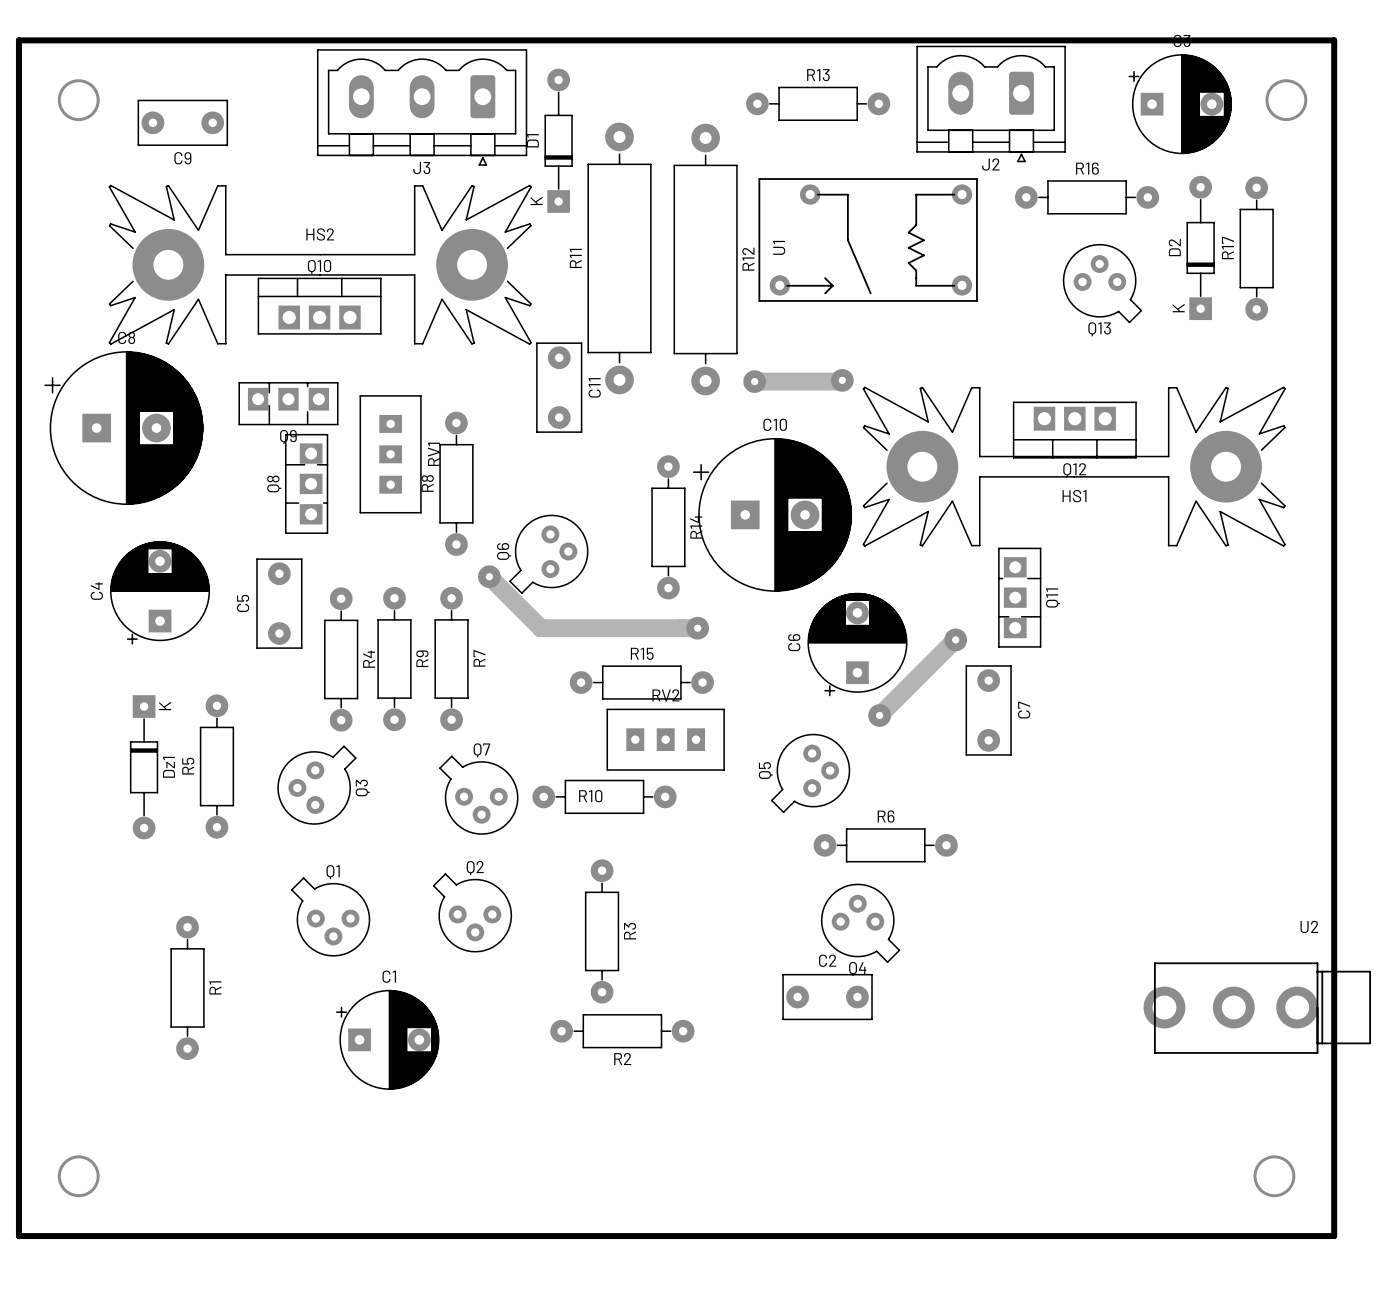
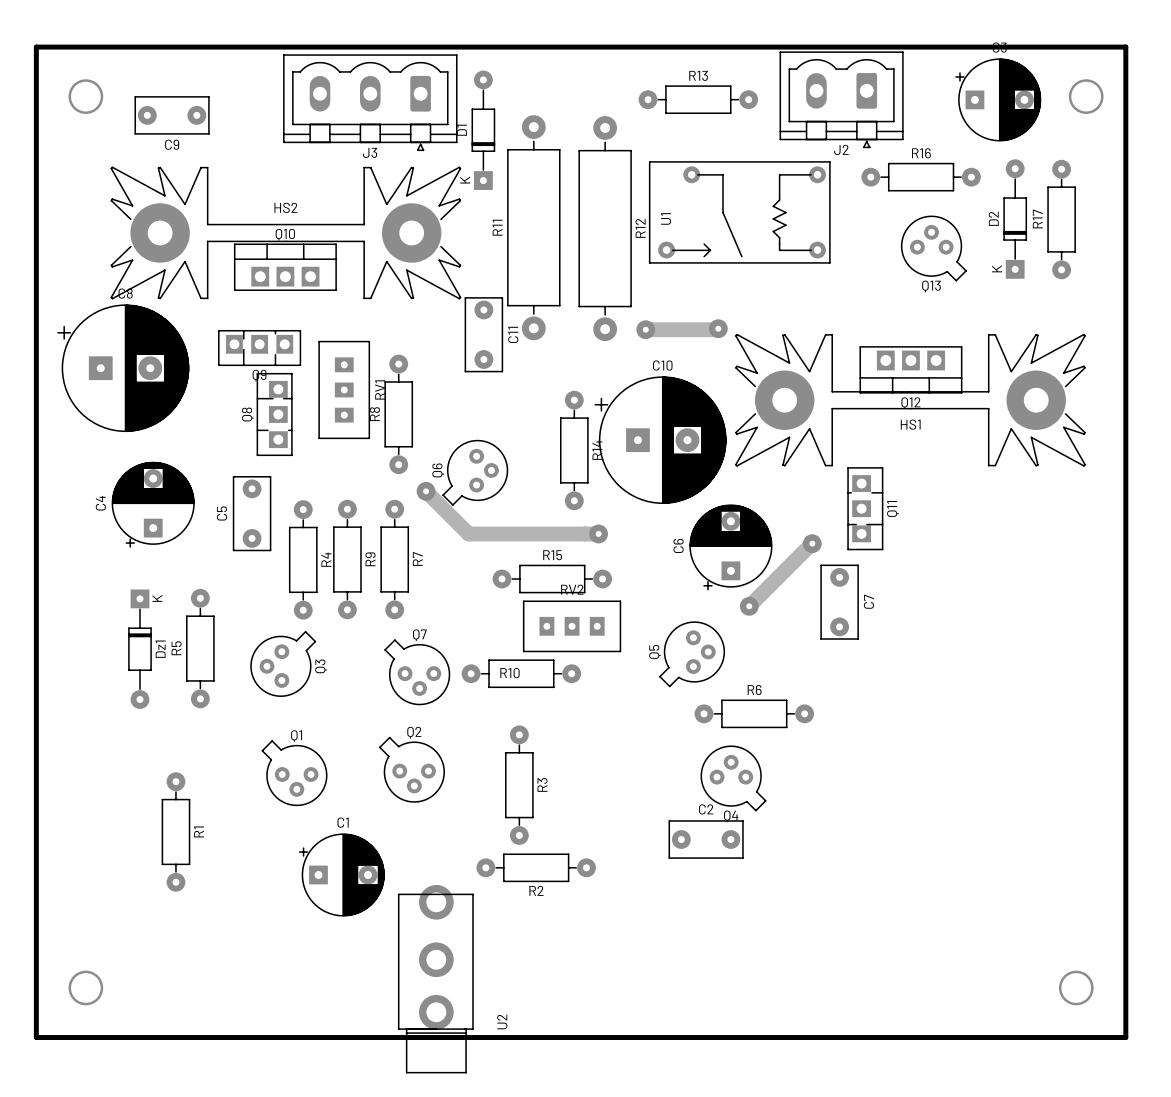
U2 rotation: 0° (1257, 1008) -> 90° clockwise (435, 979)
U2 position: (1257, 1008) -> (435, 979)

